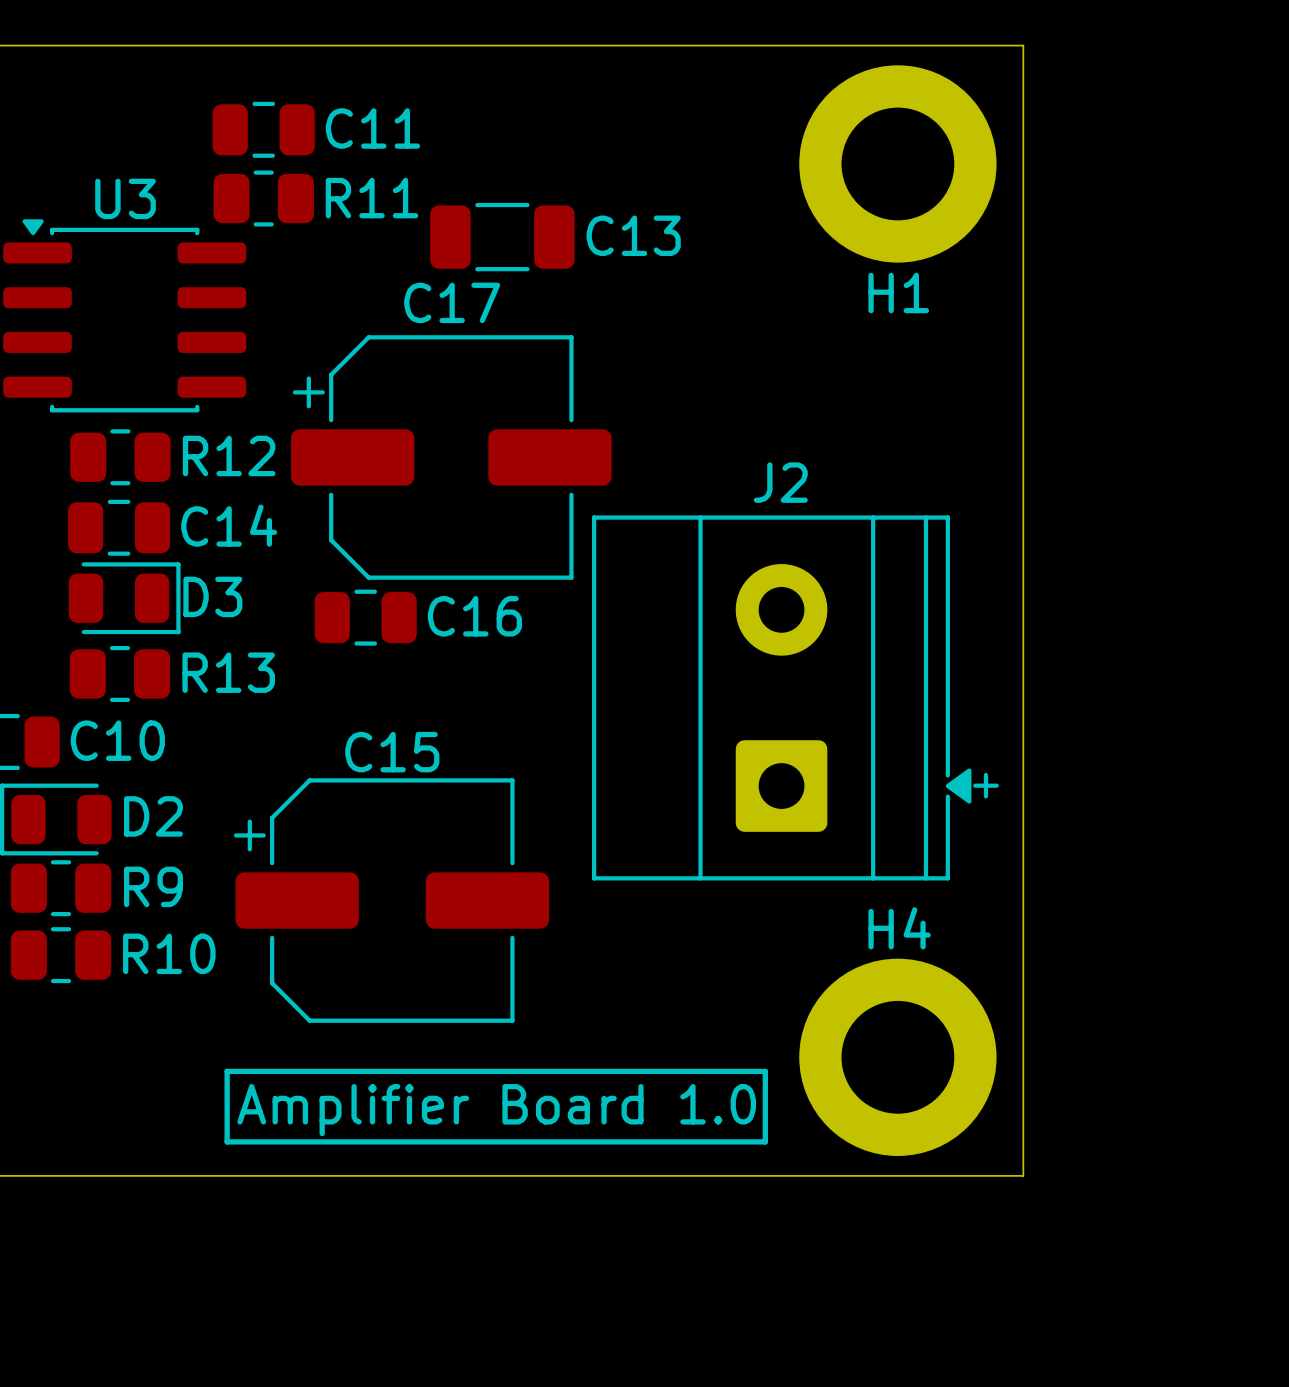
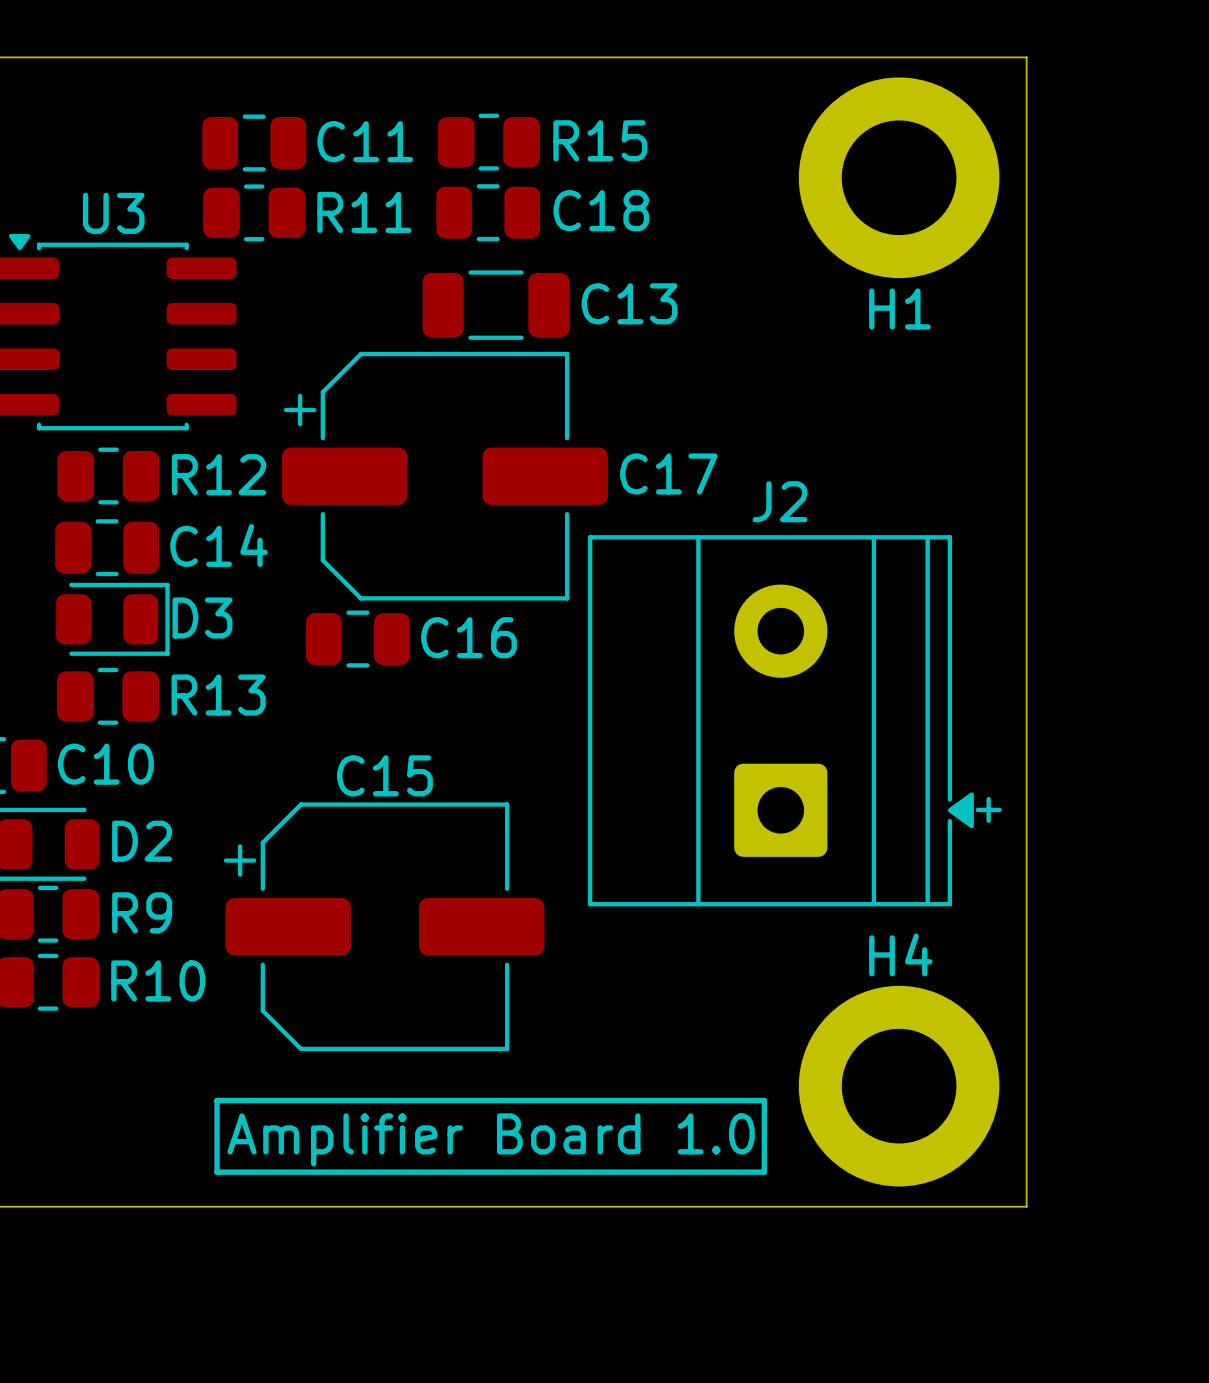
R15: none -> (488, 142)
C18: none -> (488, 212)
C13 position: (502, 237) -> (496, 305)
C17 name position: C17 (452, 302) -> C17 (668, 473)

